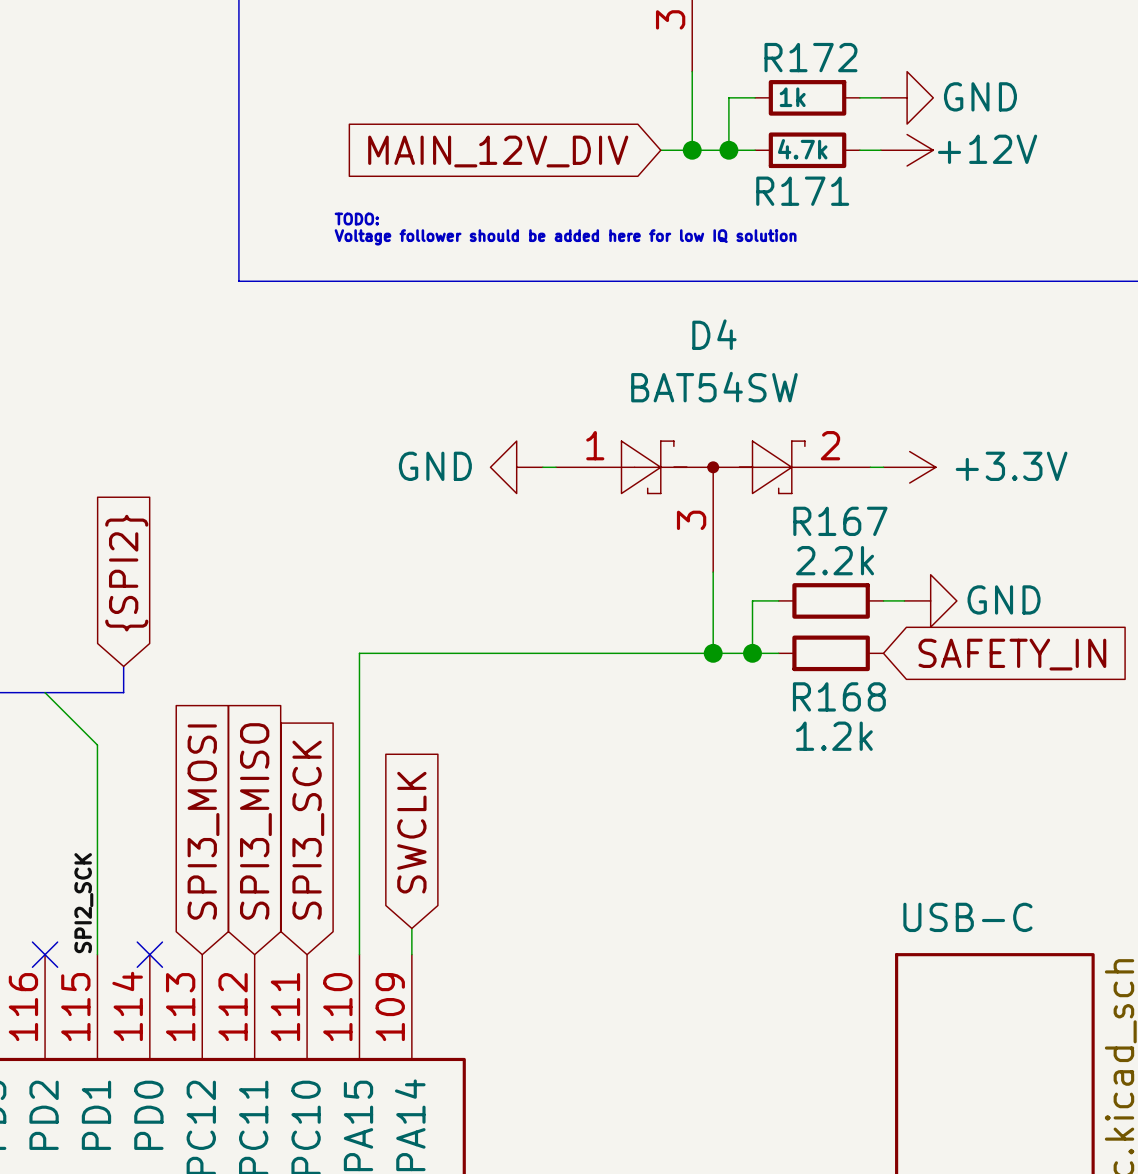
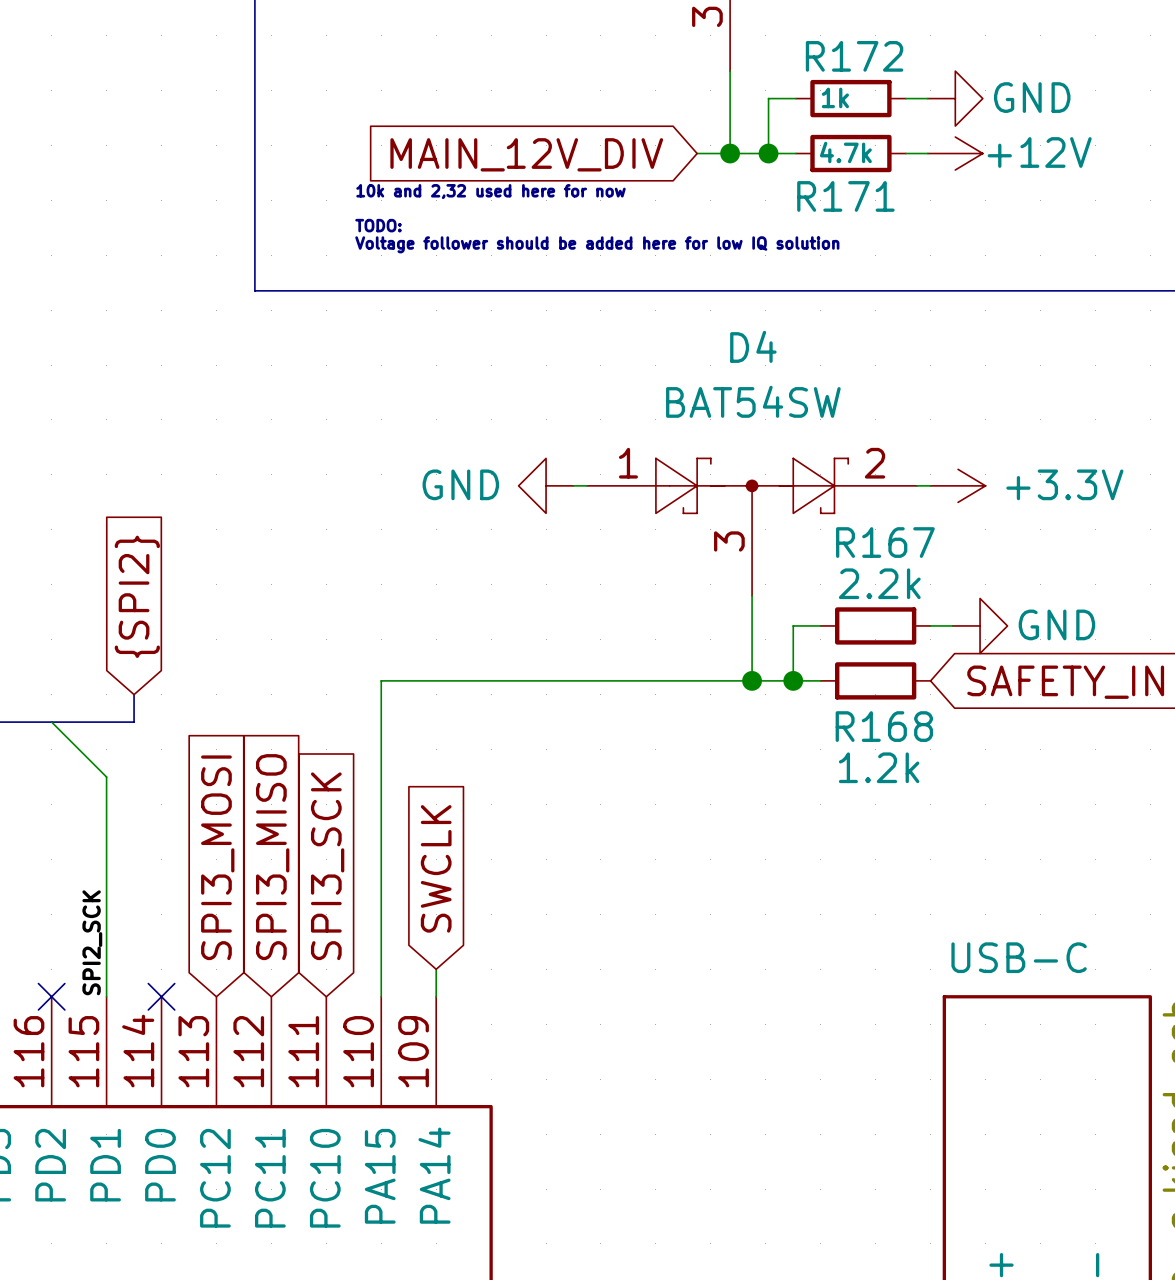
text: none -> 10k and 2,32 used here for now (491, 191)

